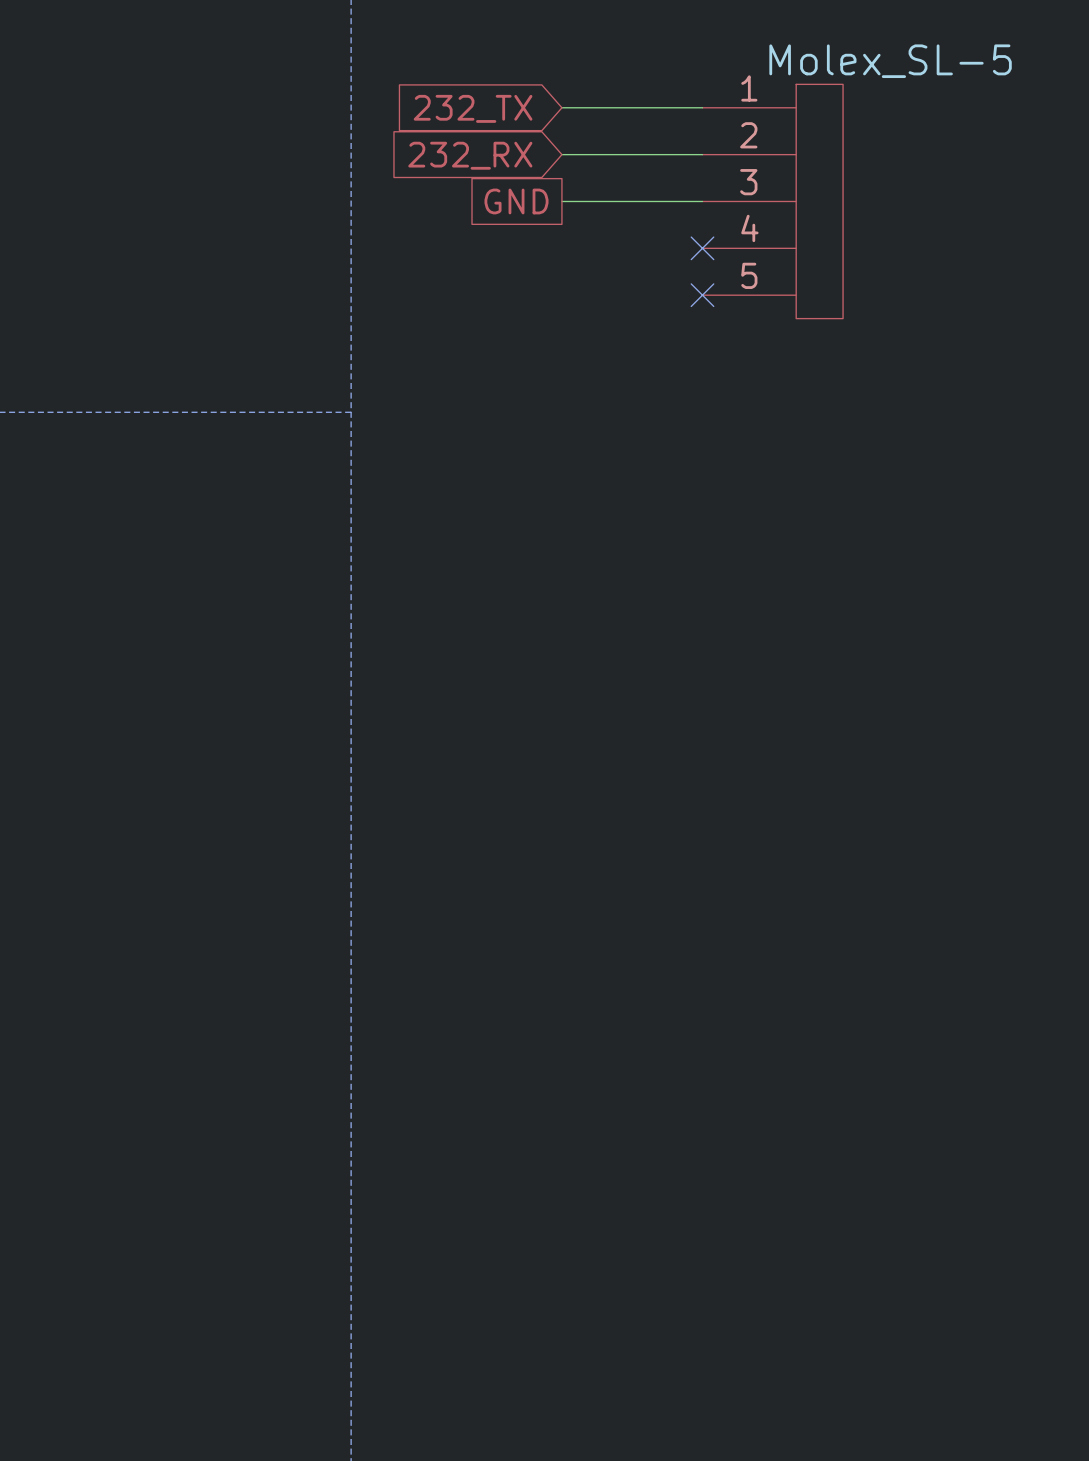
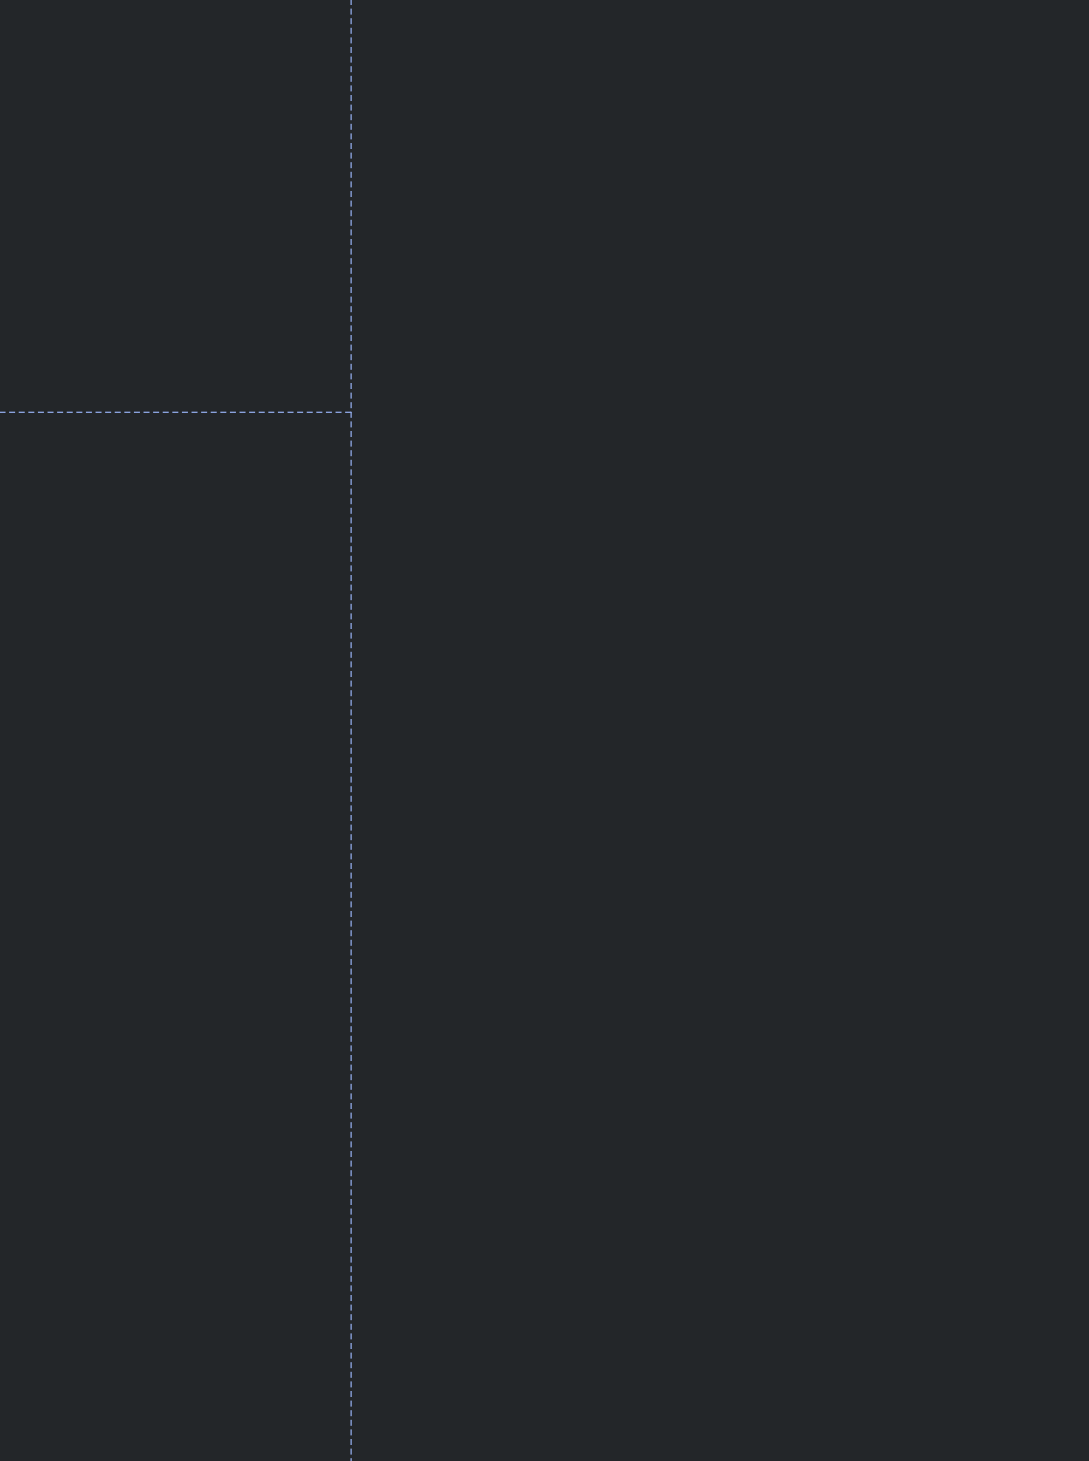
wire: (561, 107) (702, 107) -> none
global label: 232_TX (473, 108) -> none
wire: (561, 154) (702, 154) -> none
global label: 232_RX (470, 155) -> none
global label: GND (516, 201) -> none
wire: (561, 201) (702, 201) -> none
part: Molex_SL-5 (772, 201) -> none
no-connect mark: (702, 248) -> none
no-connect mark: (702, 295) -> none

